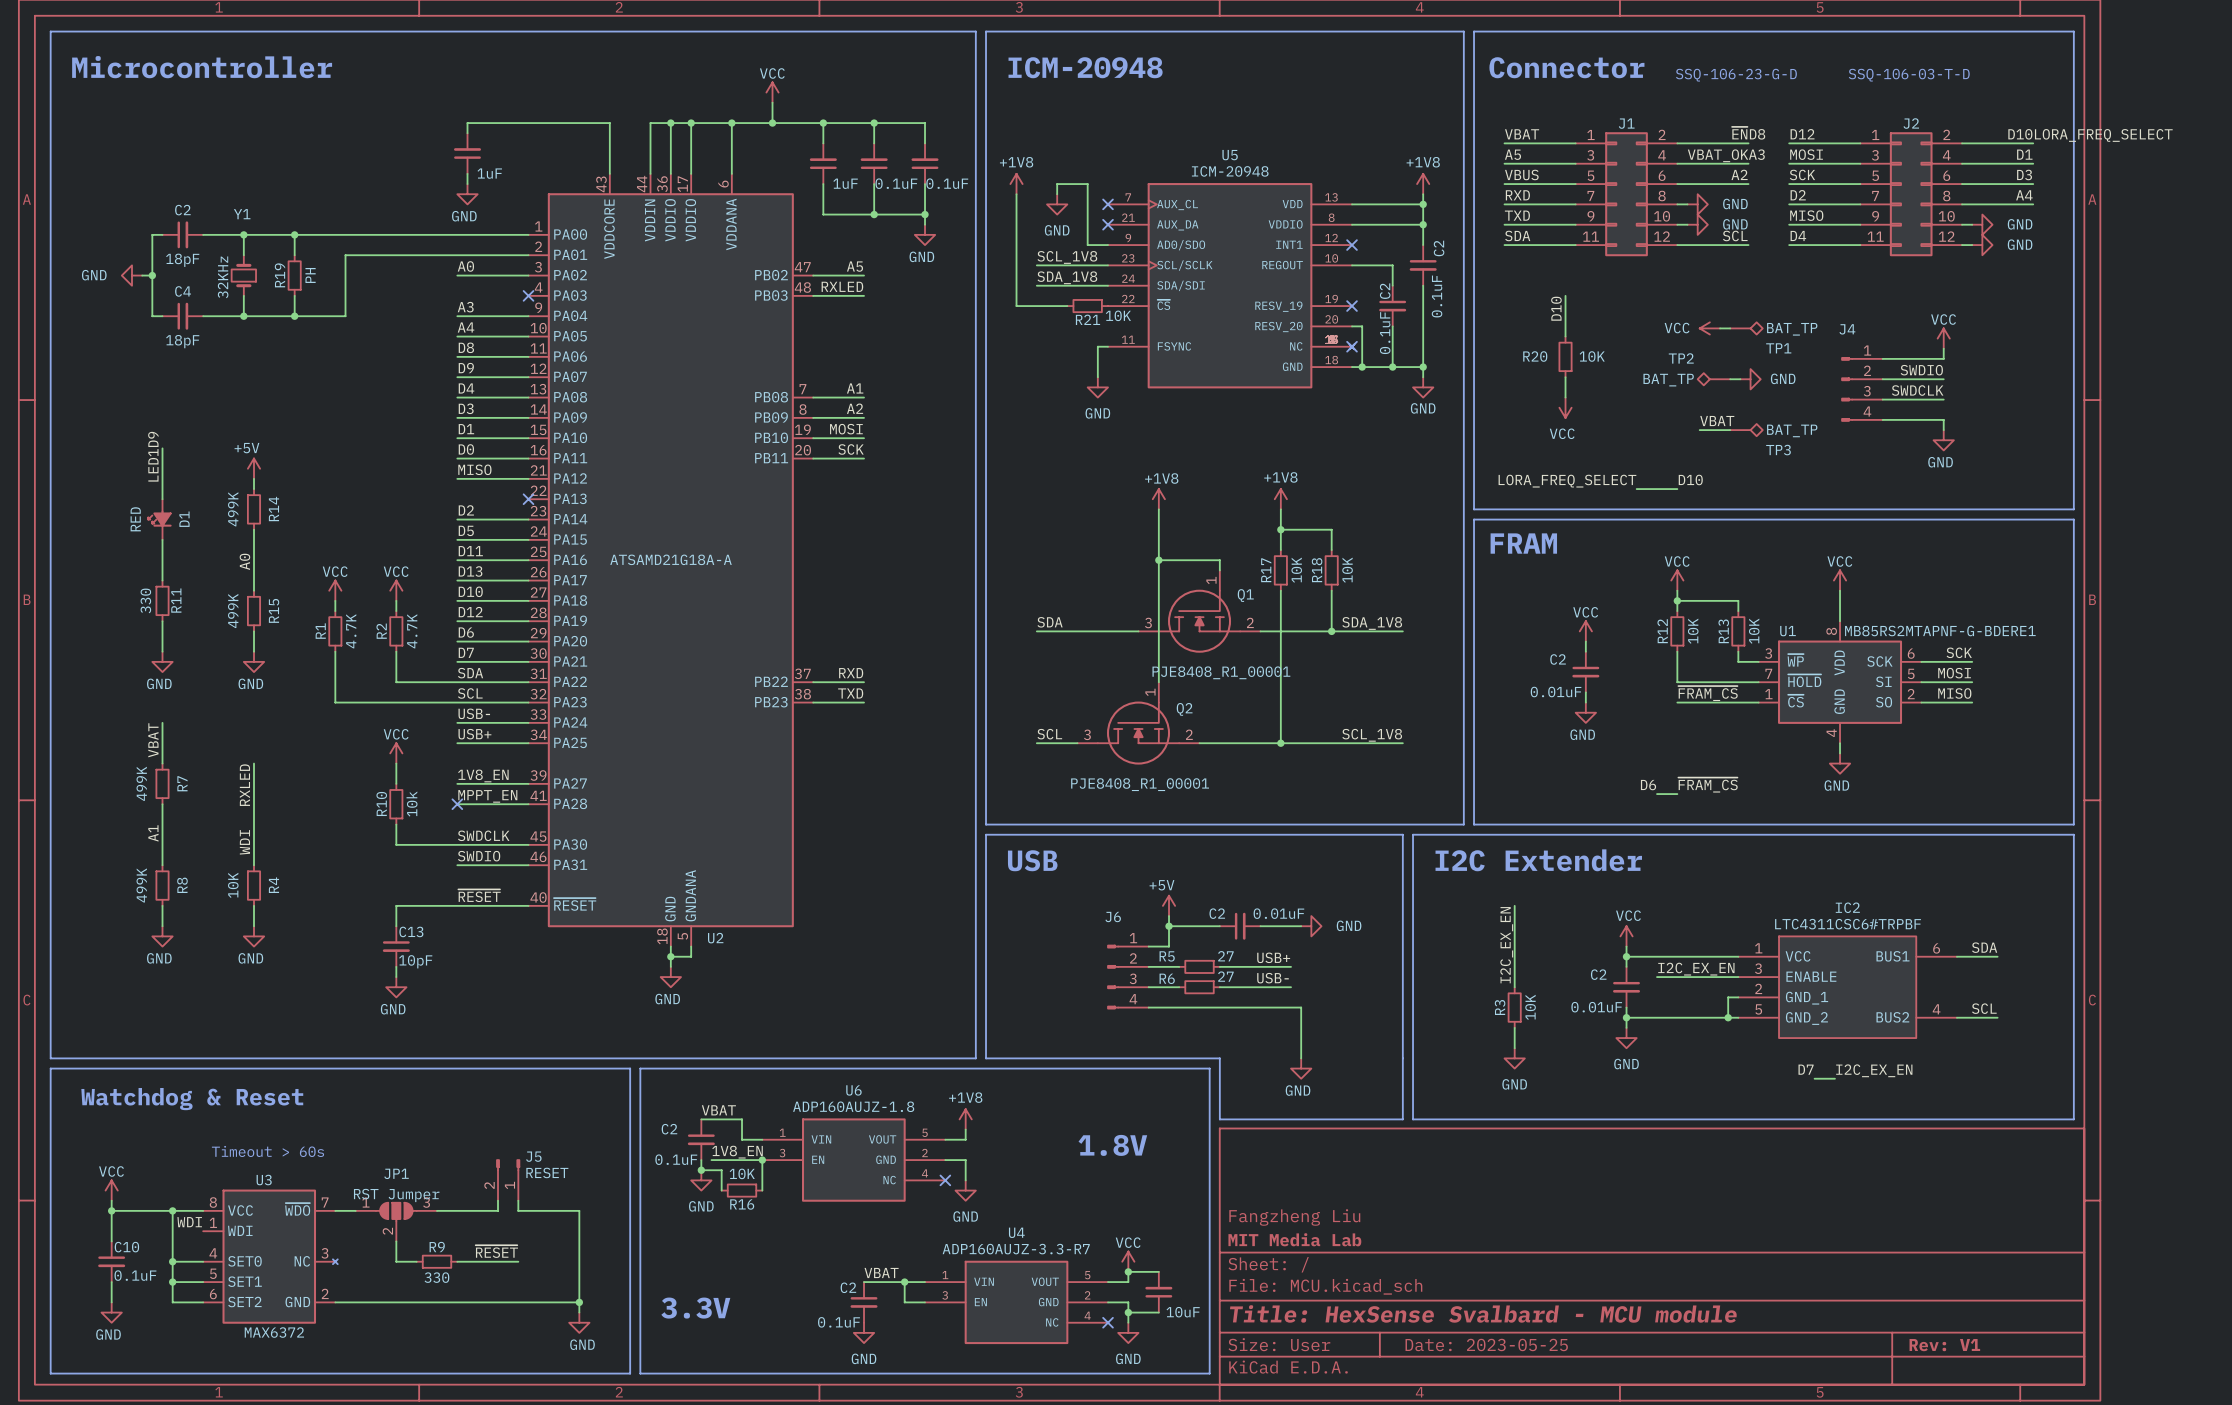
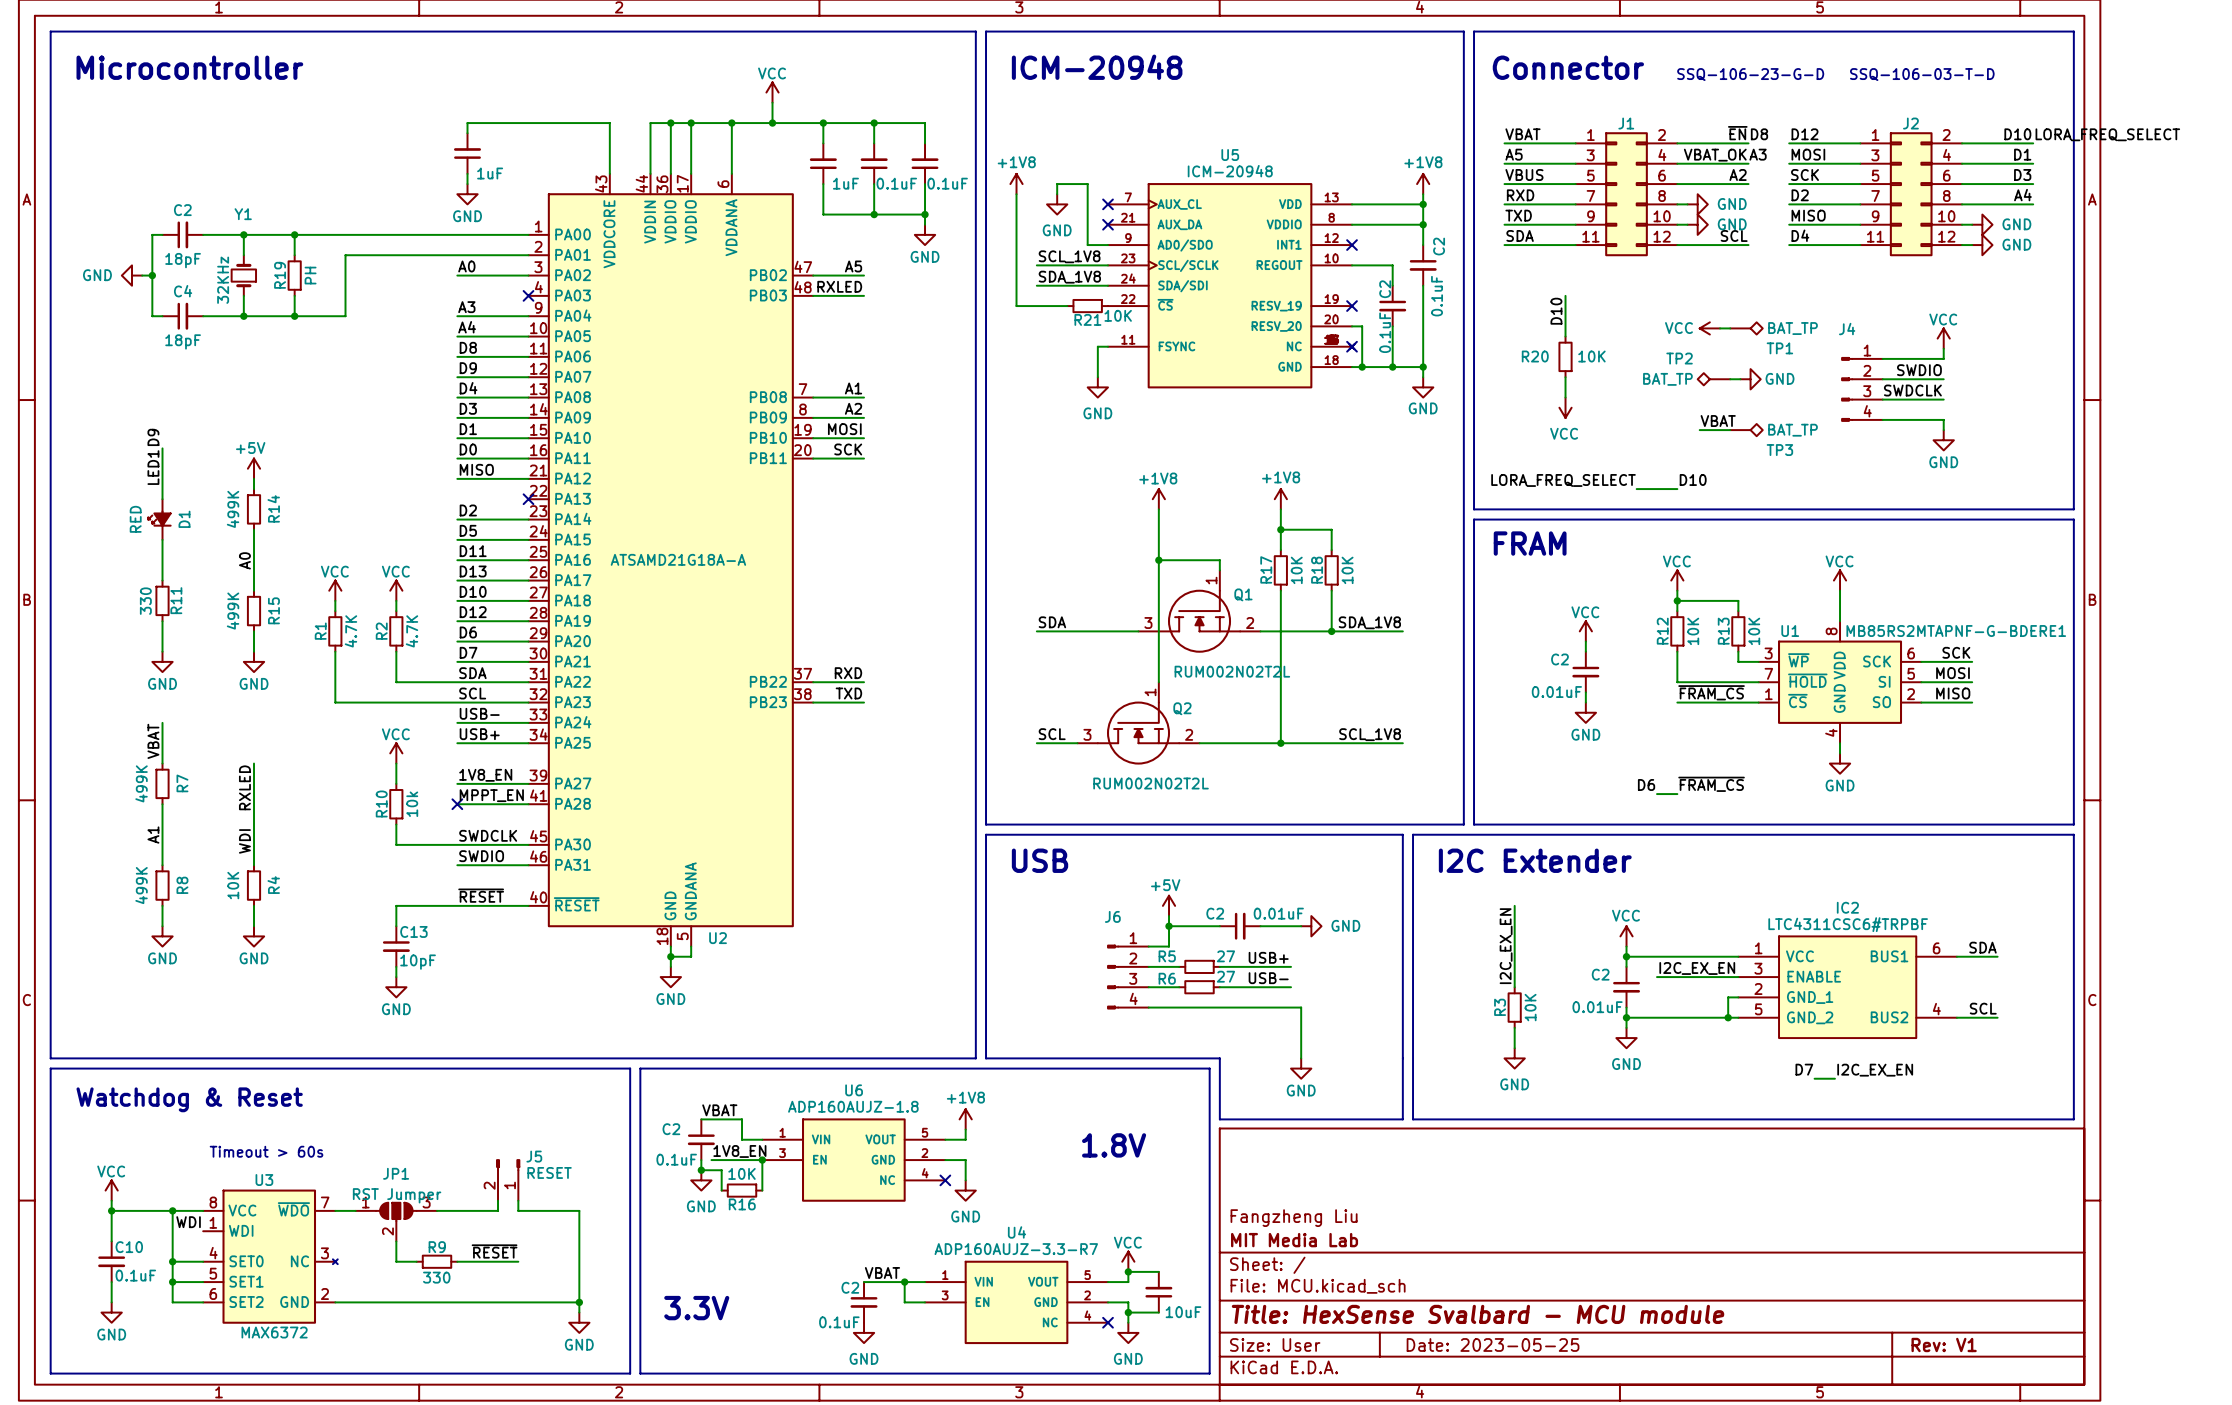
Q1 value: PJE8408_R1_00001 (1221, 672) -> RUM002N02T2L (1232, 671)
Q2 value: PJE8408_R1_00001 (1140, 784) -> RUM002N02T2L (1151, 783)

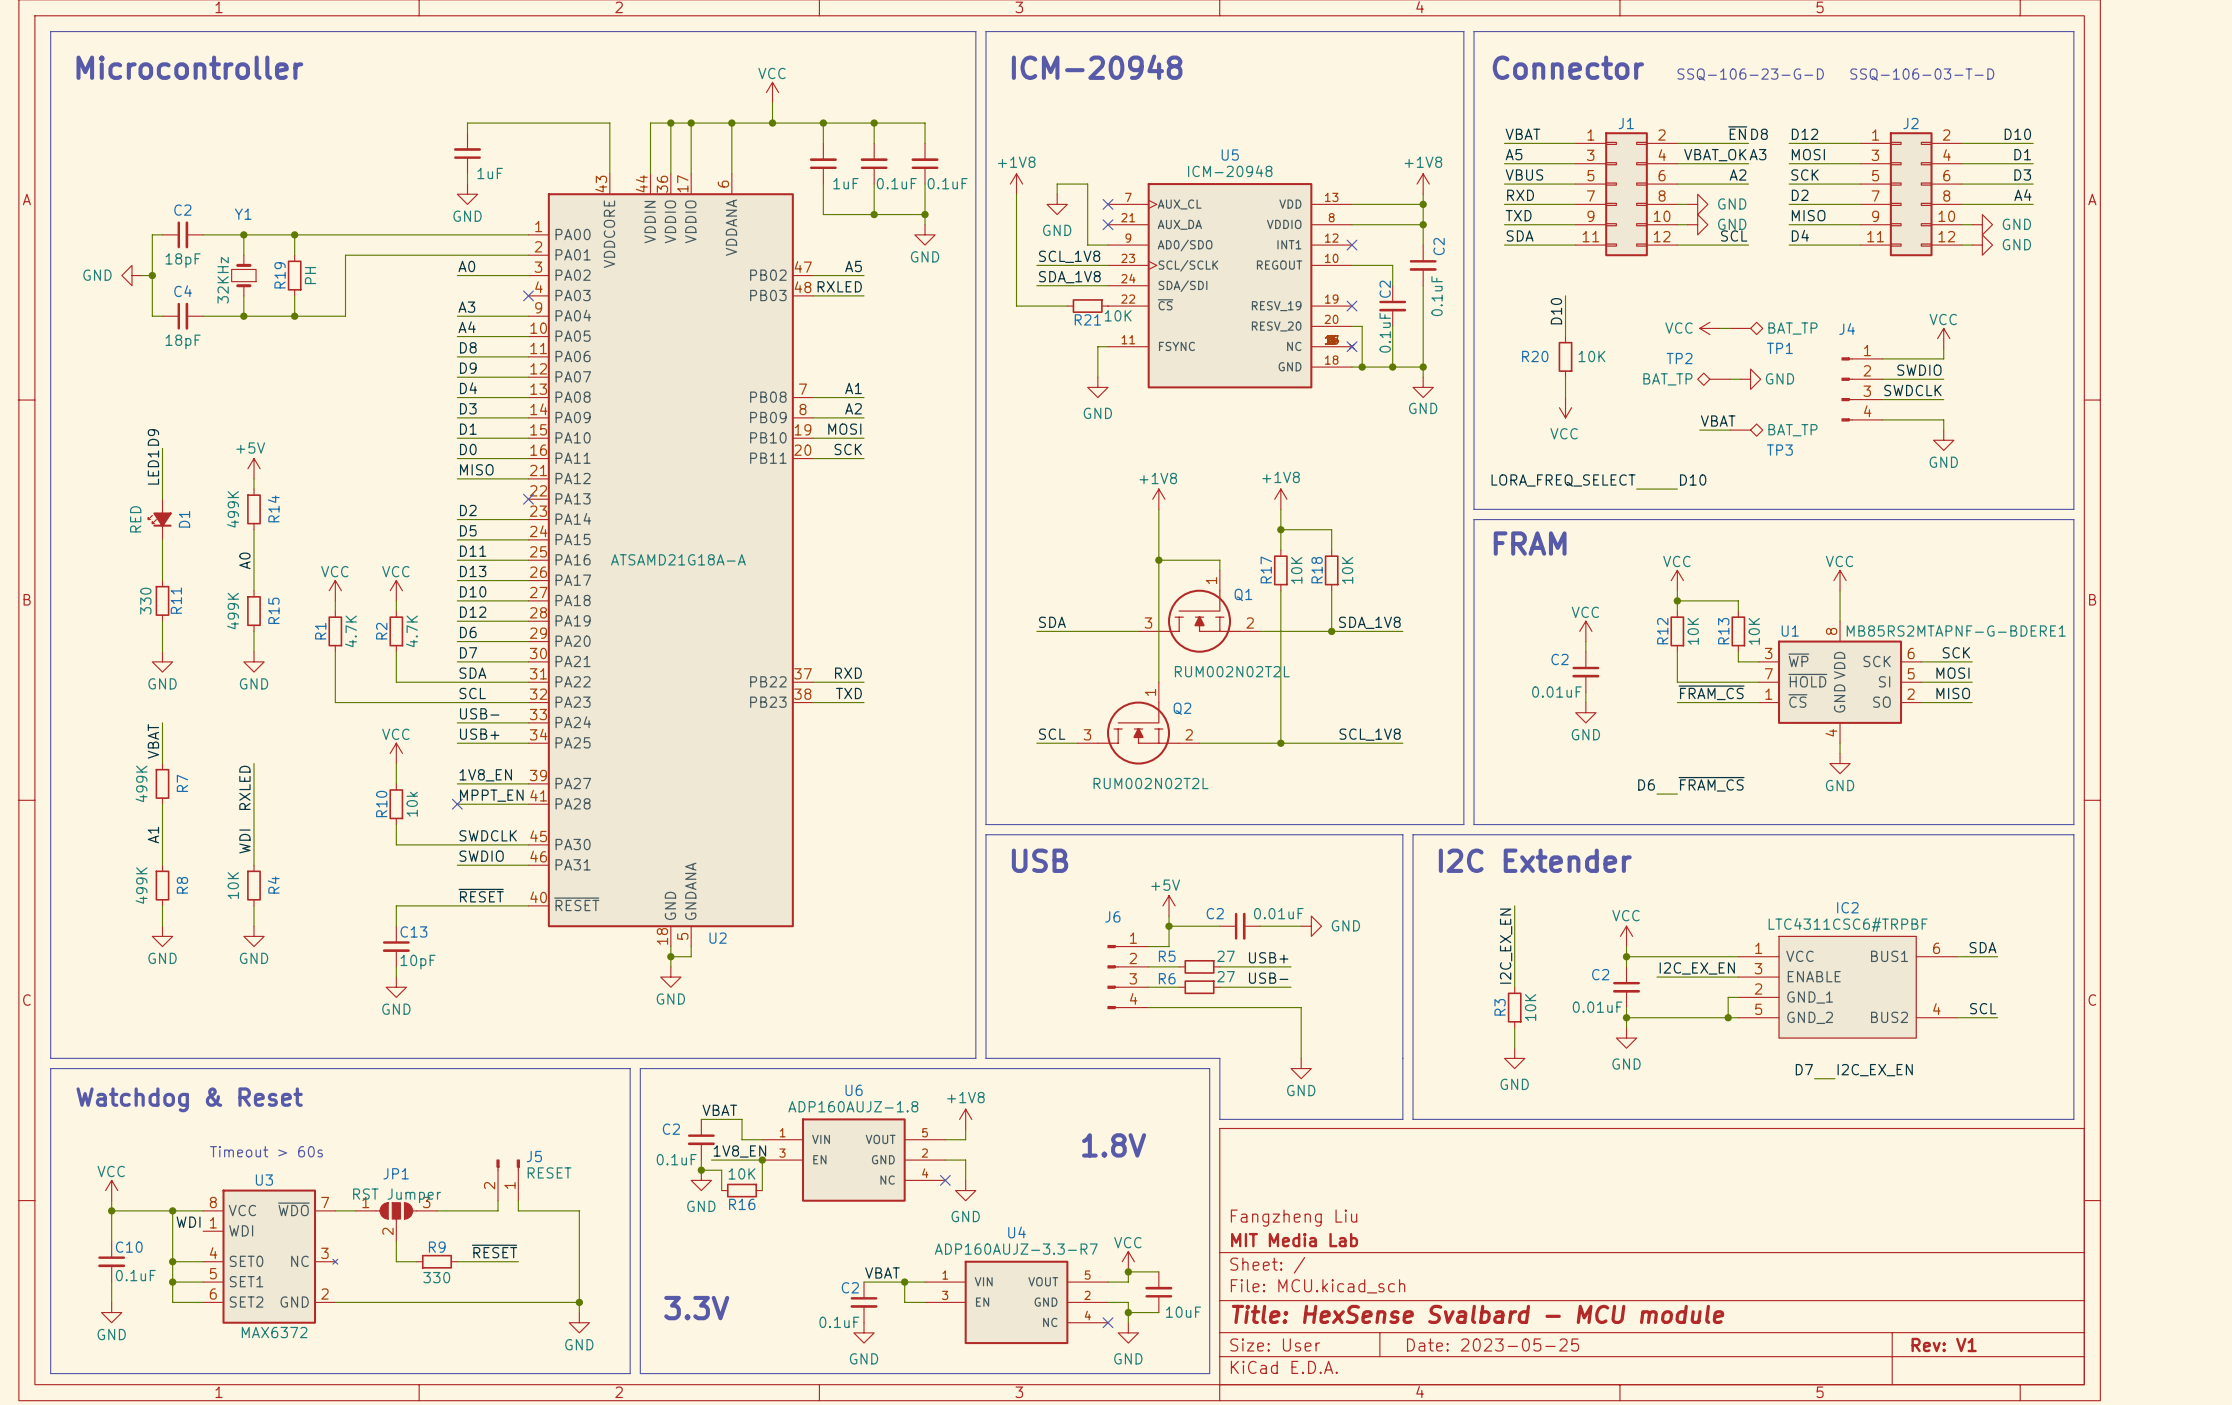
label: LORA_FREQ_SELECT (2107, 134) -> none

